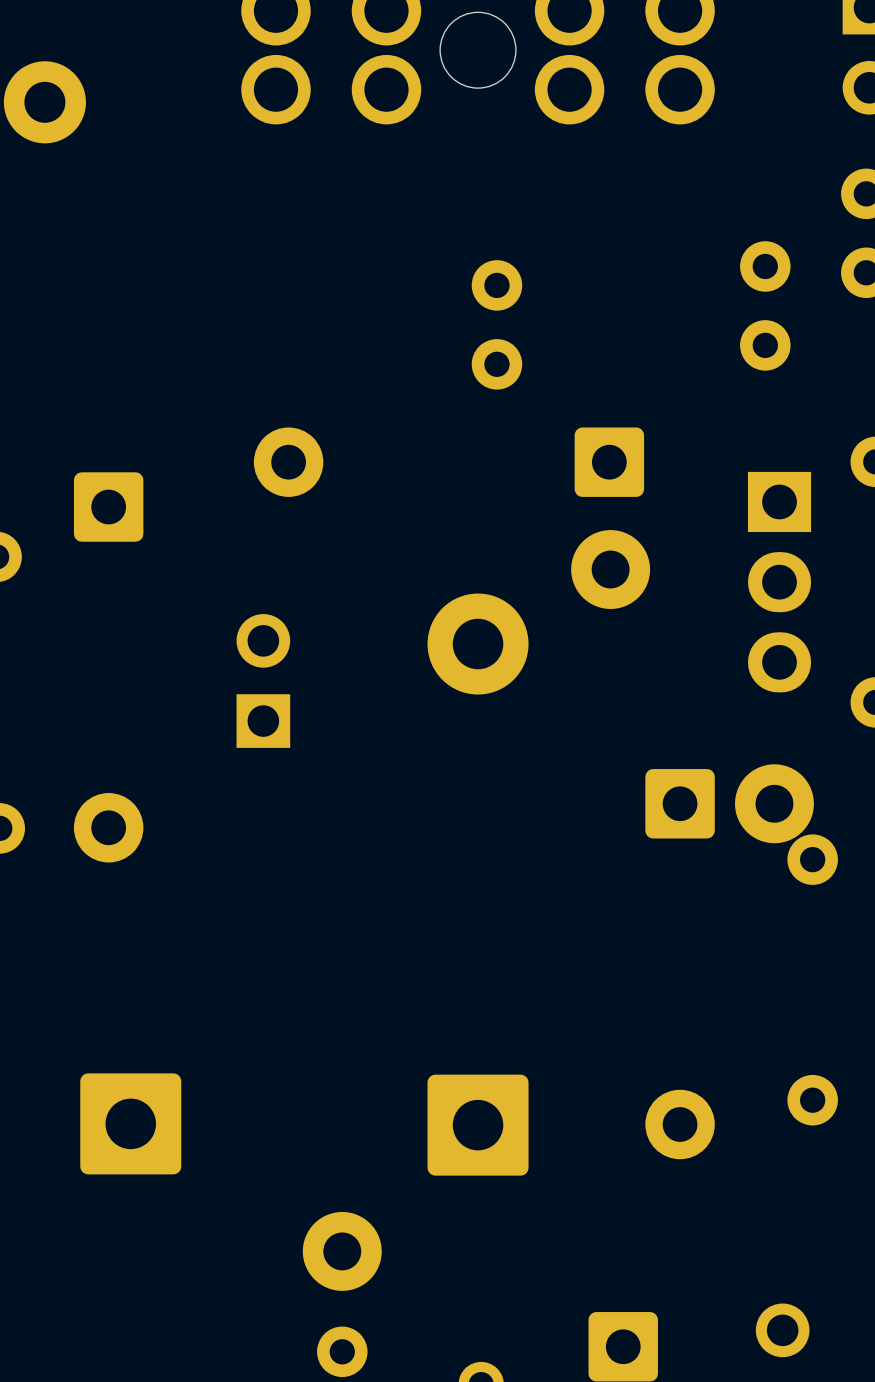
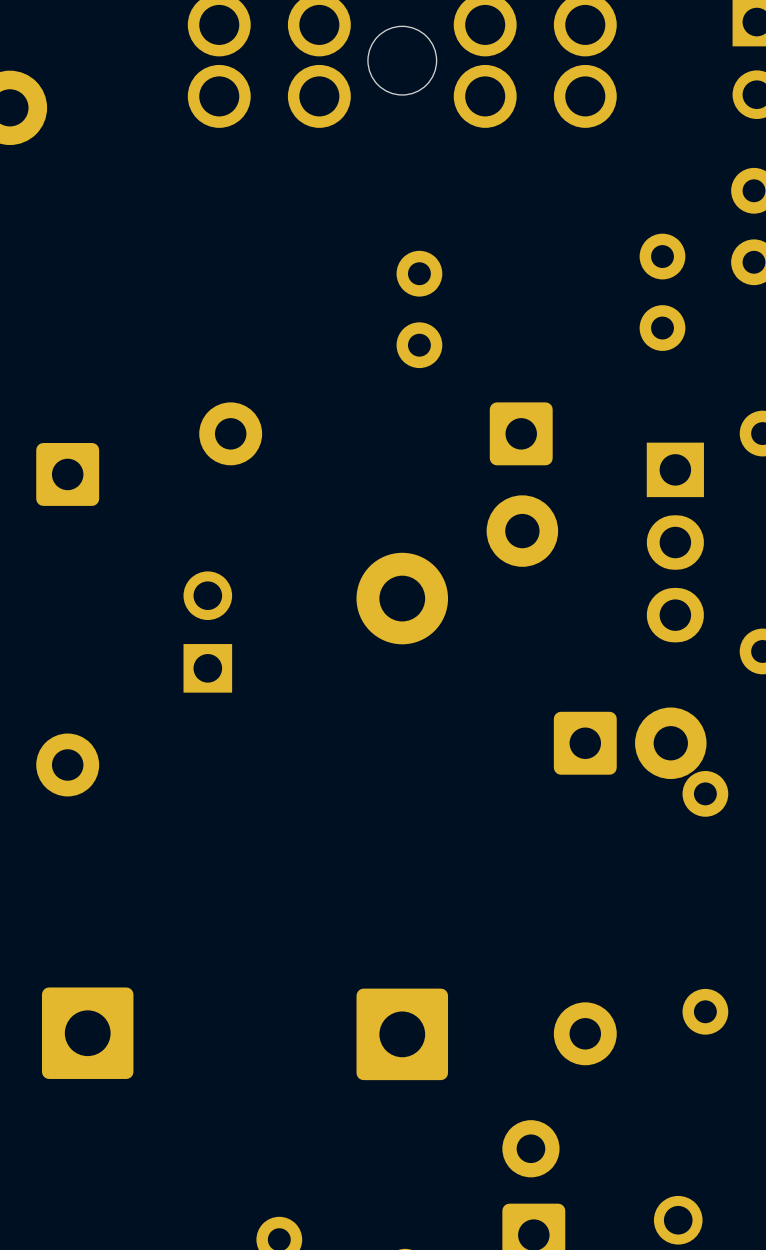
part: (342, 1251) -> none
part: none -> (530, 1148)

